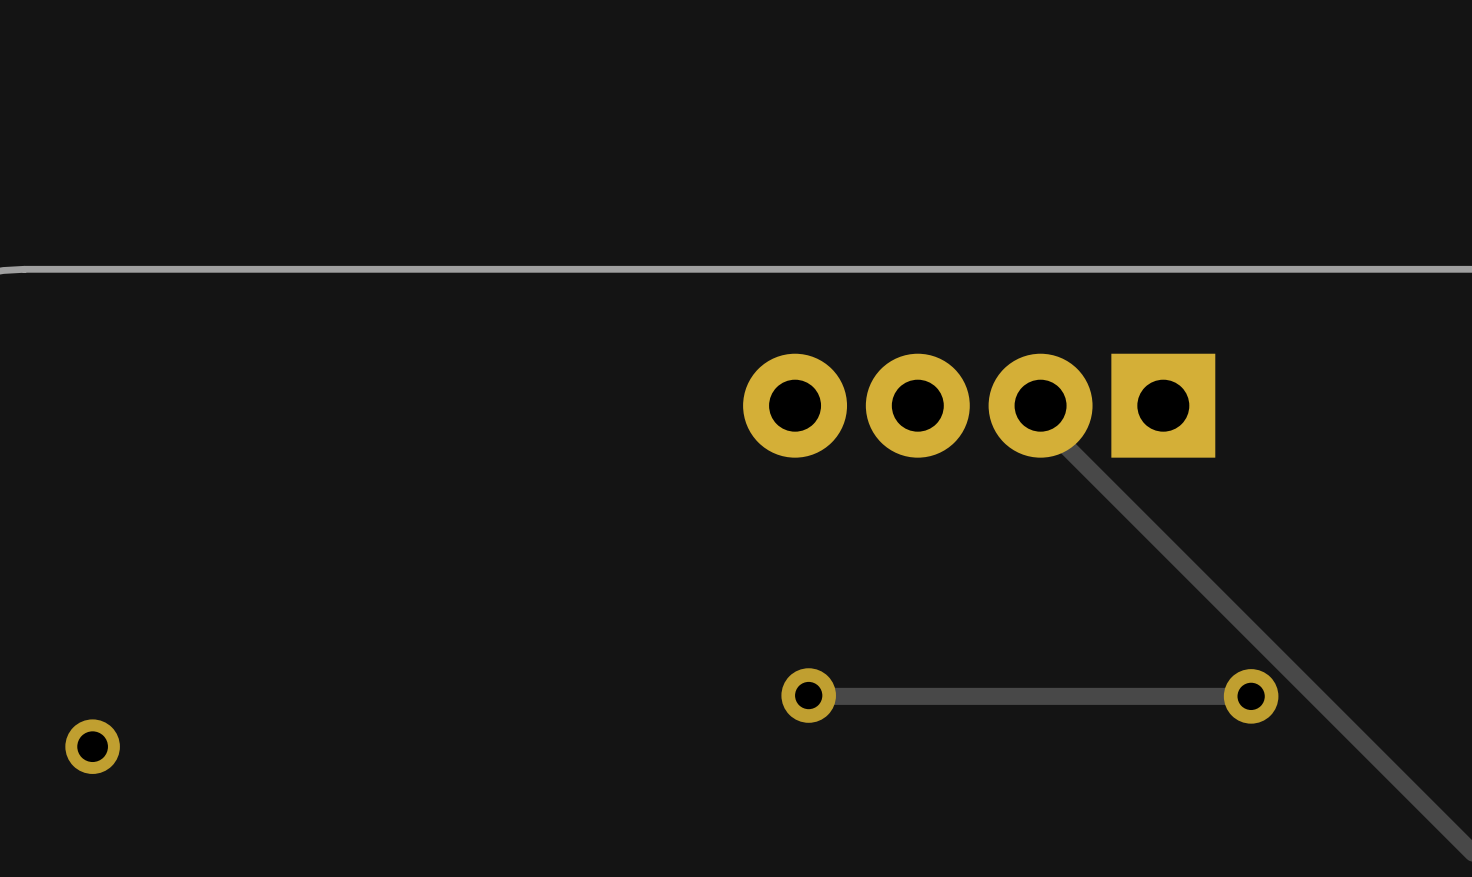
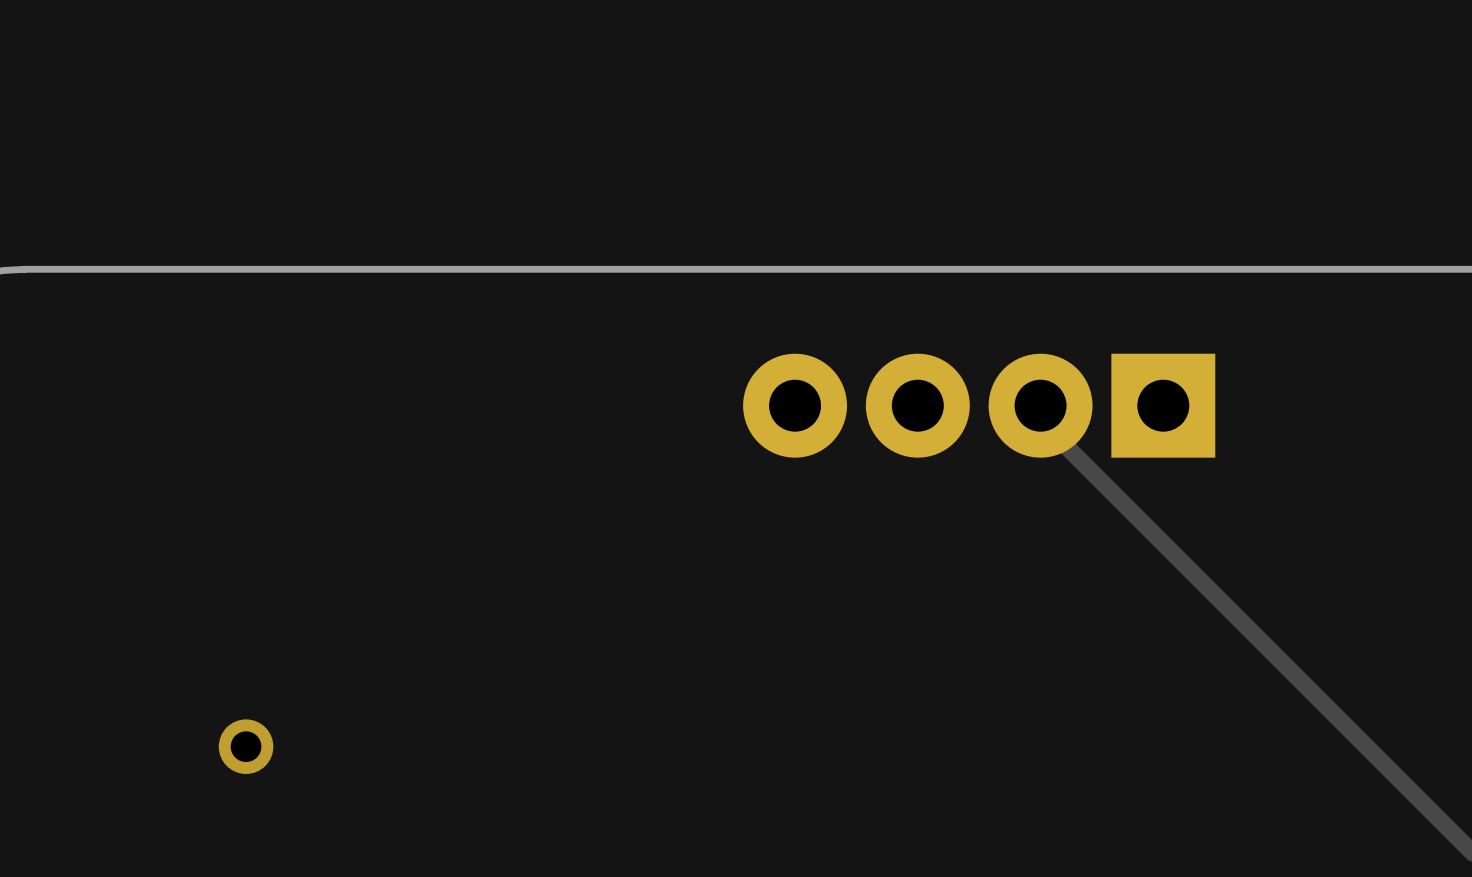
via: (808, 695) -> none
track: (1251, 696) (809, 696) -> none
via: (1251, 696) -> none
via position: (92, 746) -> (246, 746)

